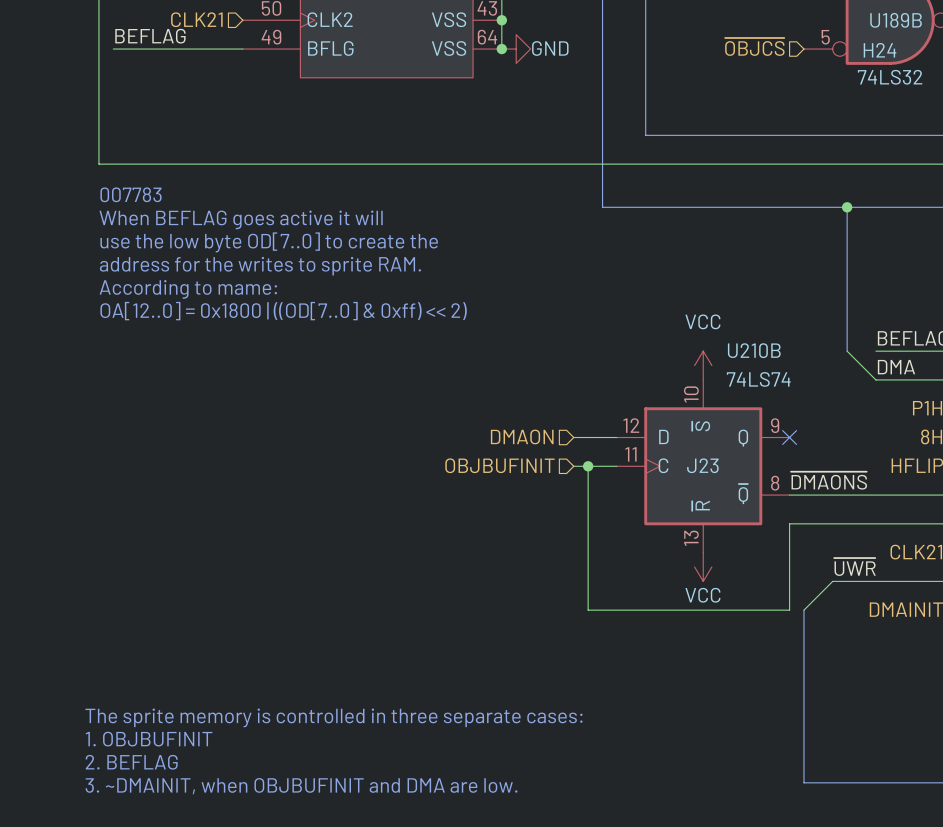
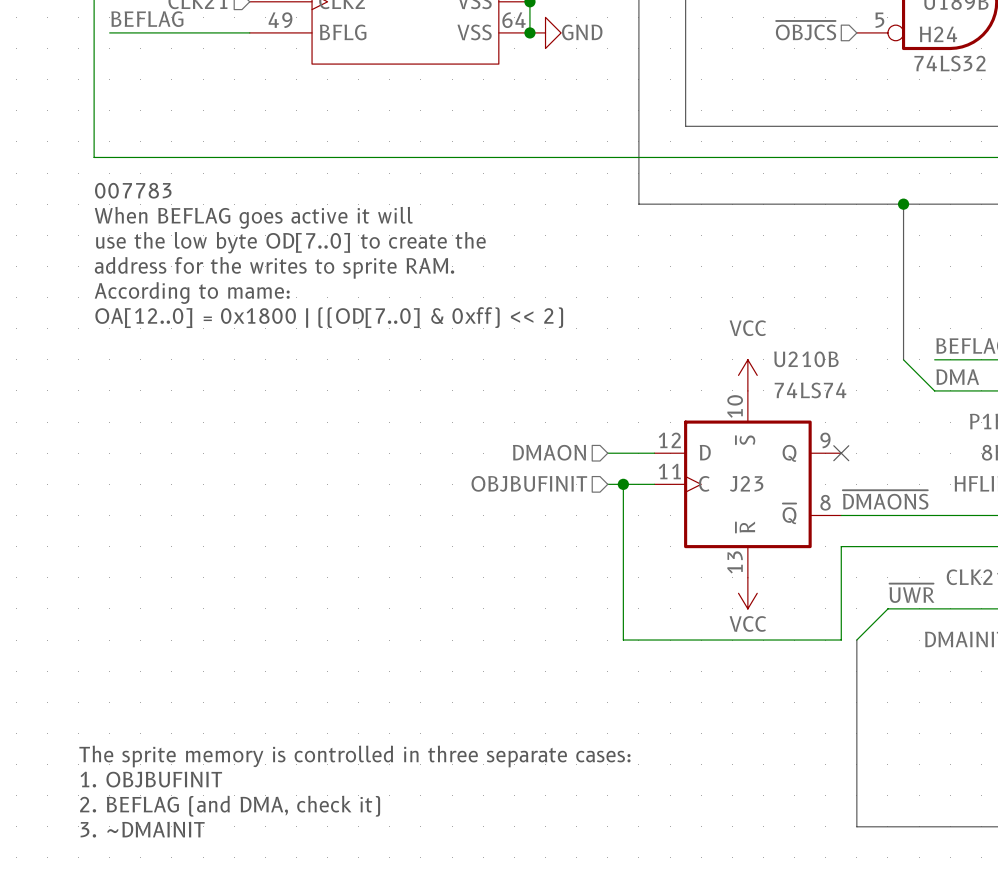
text: 2. BEFLAG (131, 762) -> 2. BEFLAG (and DMA, check it) (230, 806)
text: 3. ~DMAINIT, when OBJBUFINIT and DMA are low. (301, 786) -> 3. ~DMAINIT (142, 829)

